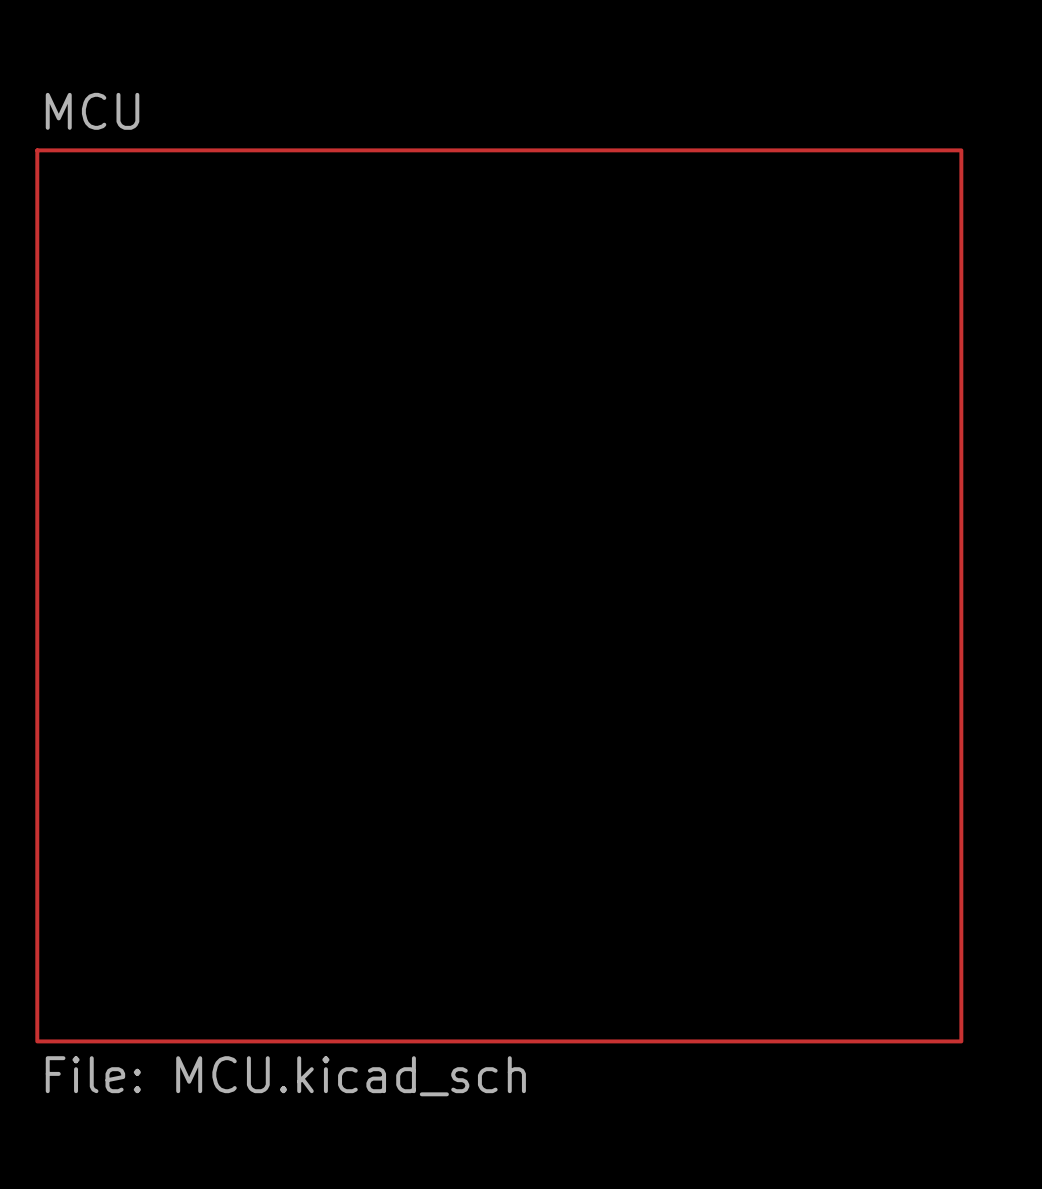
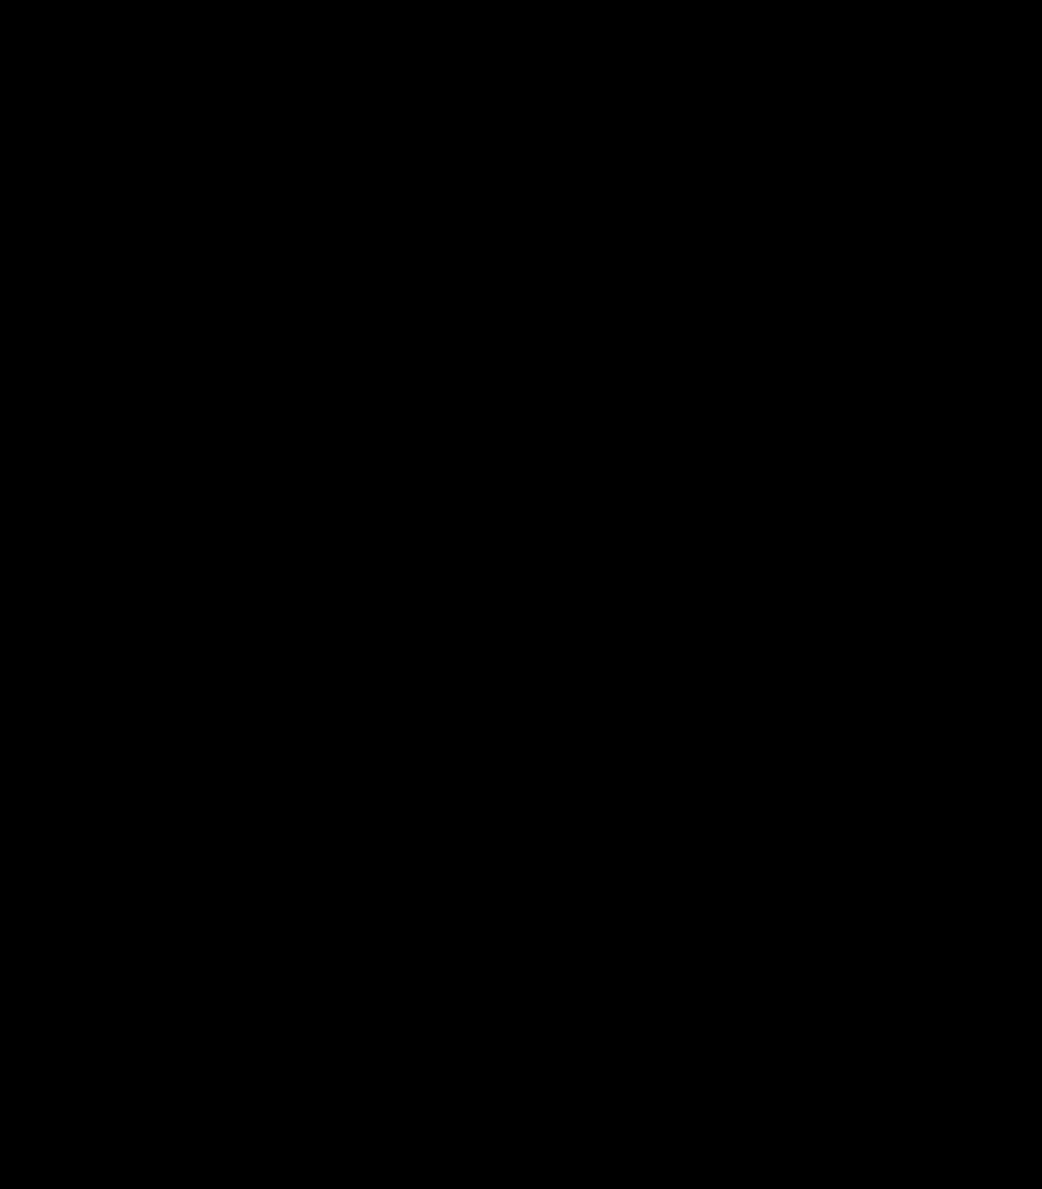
sheet MCU: File: MCU.kicad_sch (499, 595) -> none

